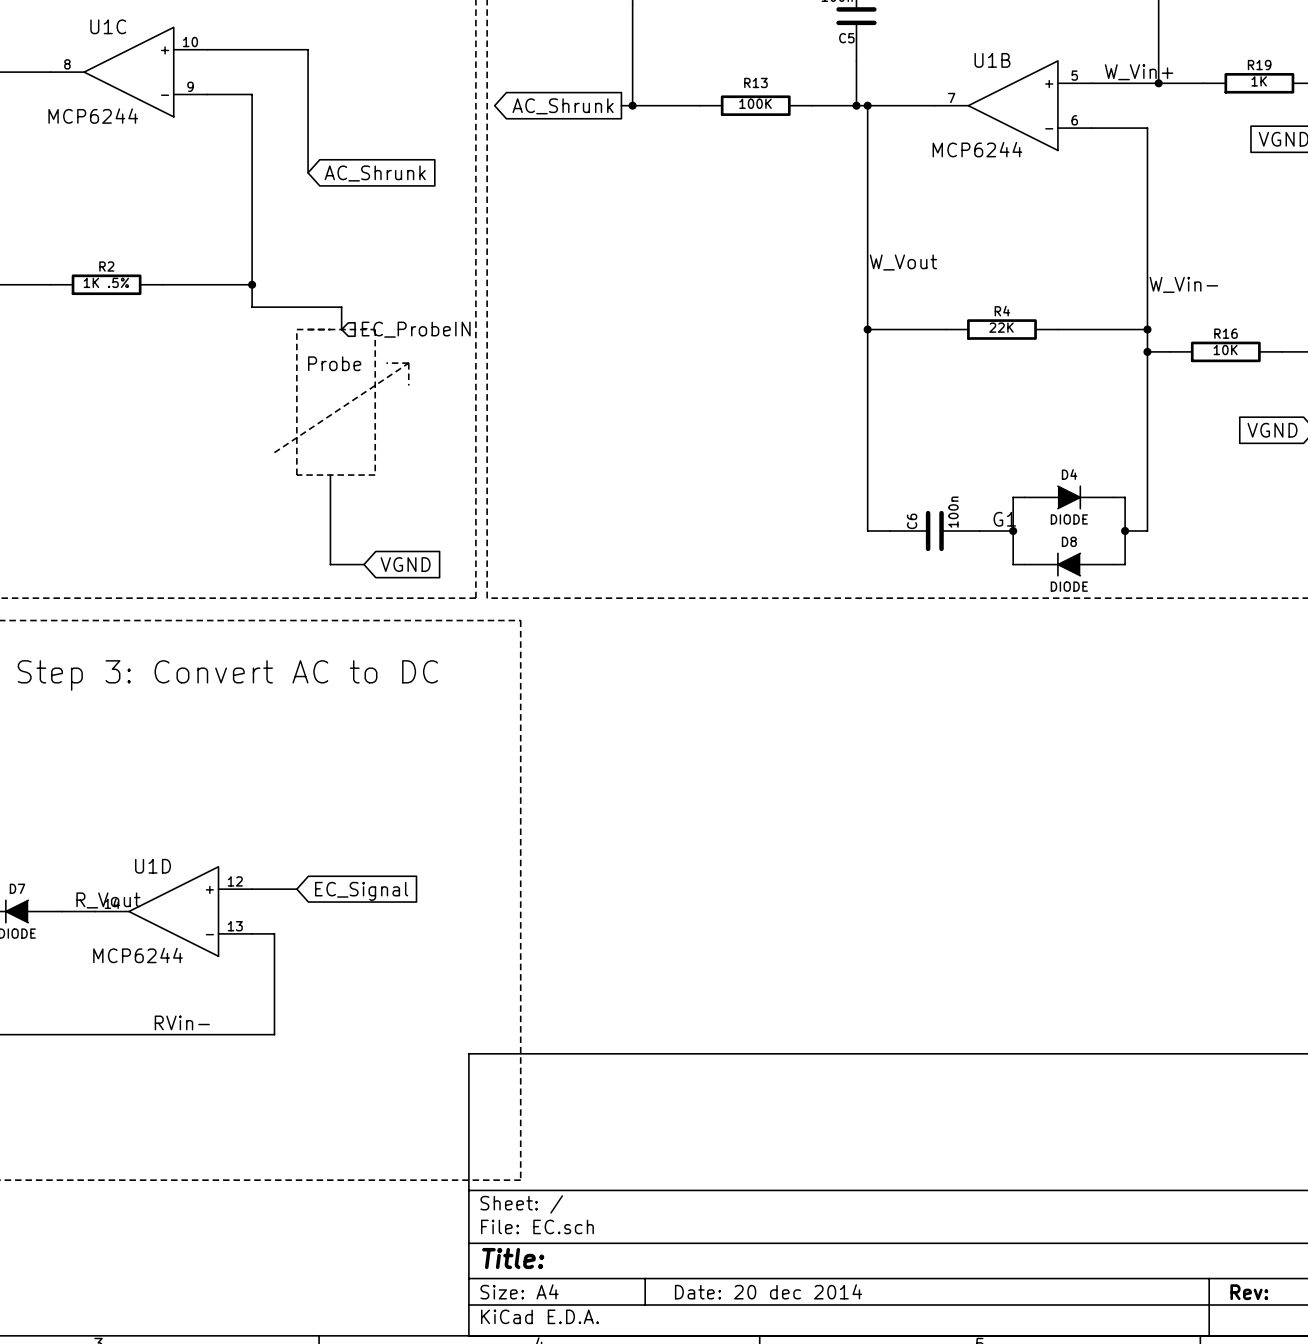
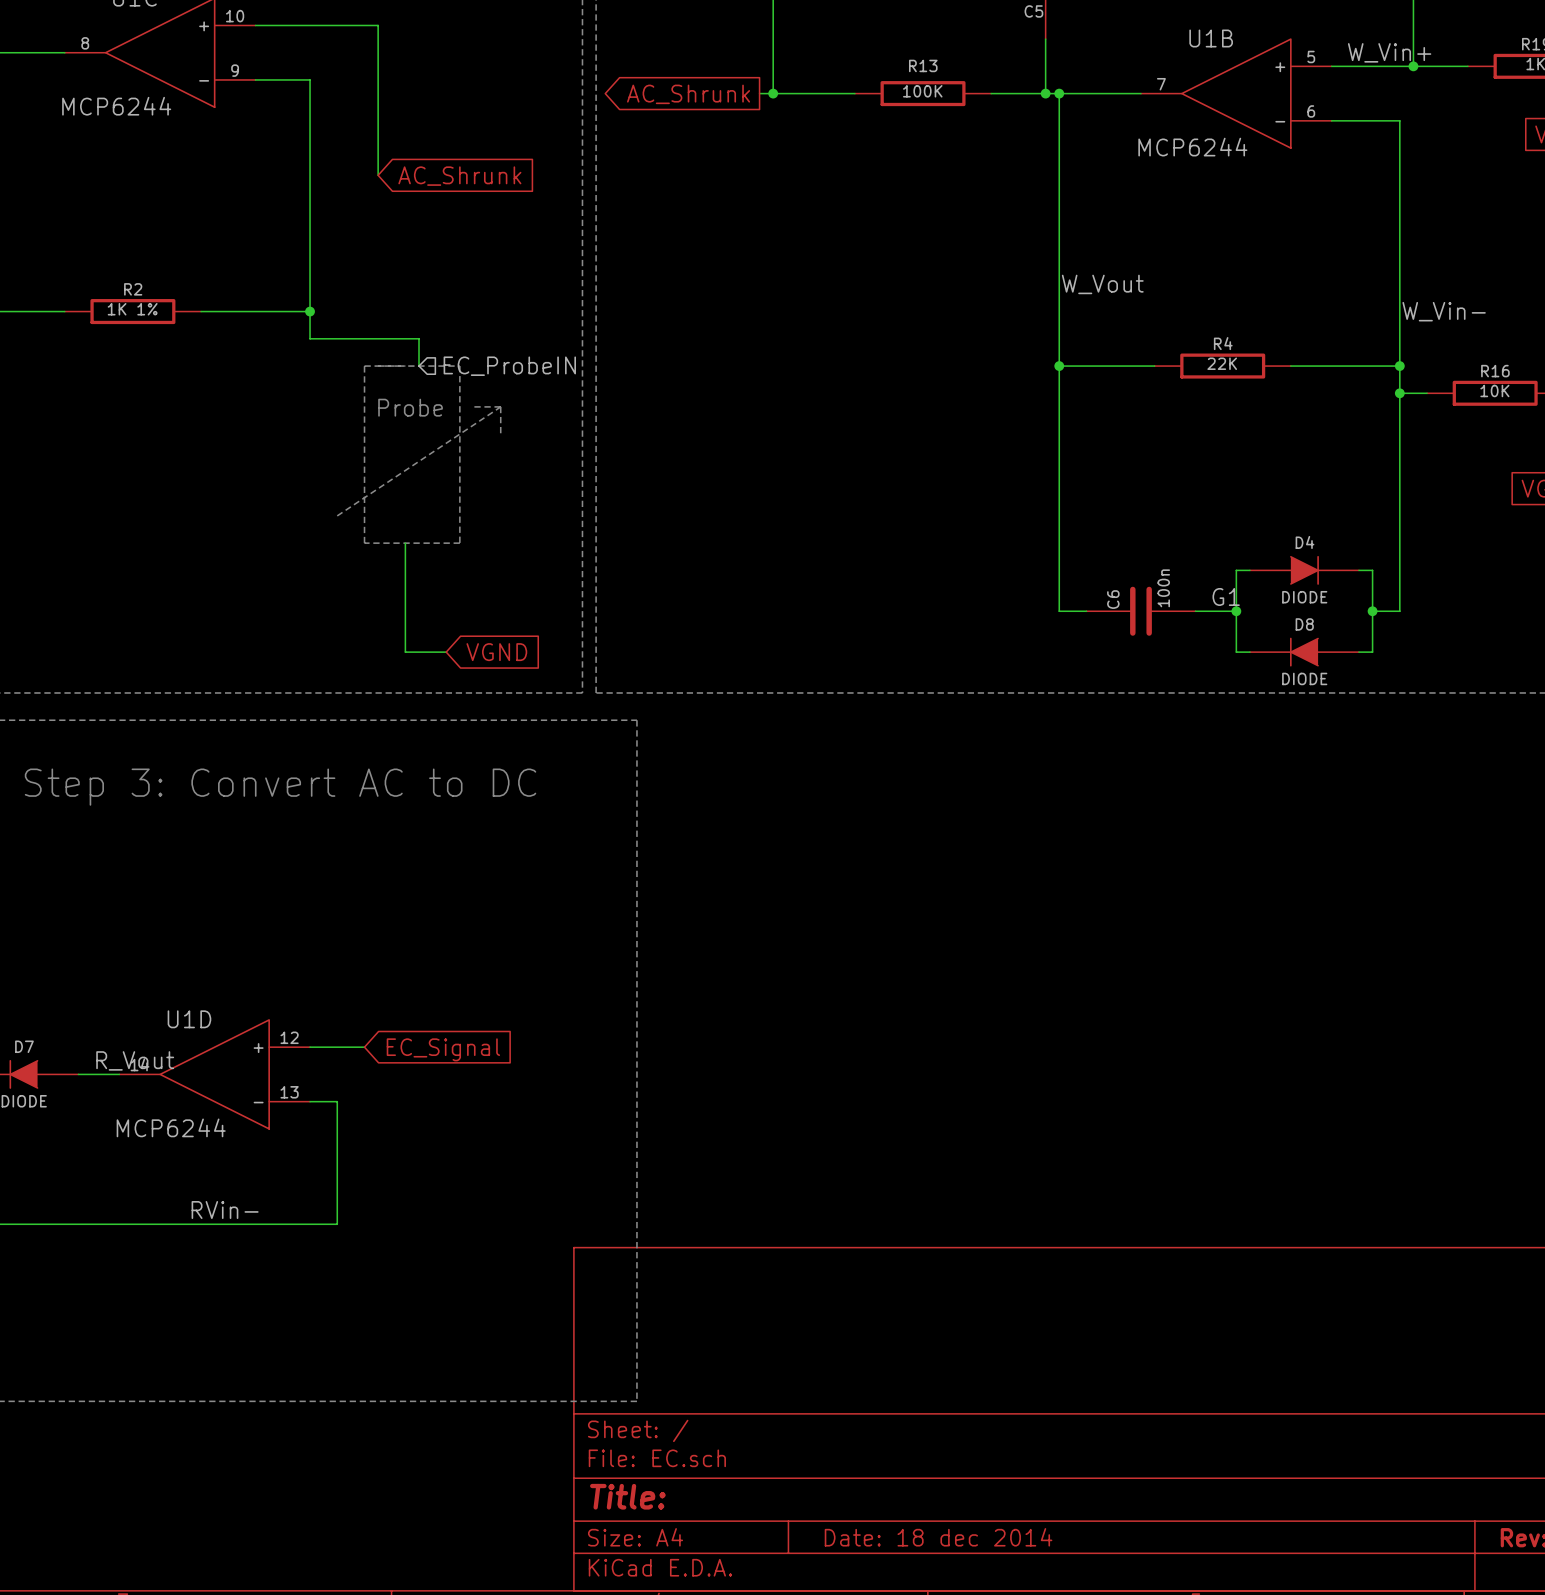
R2 value: 1K .5% (106, 282) -> 1K 1% (132, 309)
title block: Date: 20 dec 2014 (768, 1291) -> Date: 18 dec 2014 (938, 1537)

